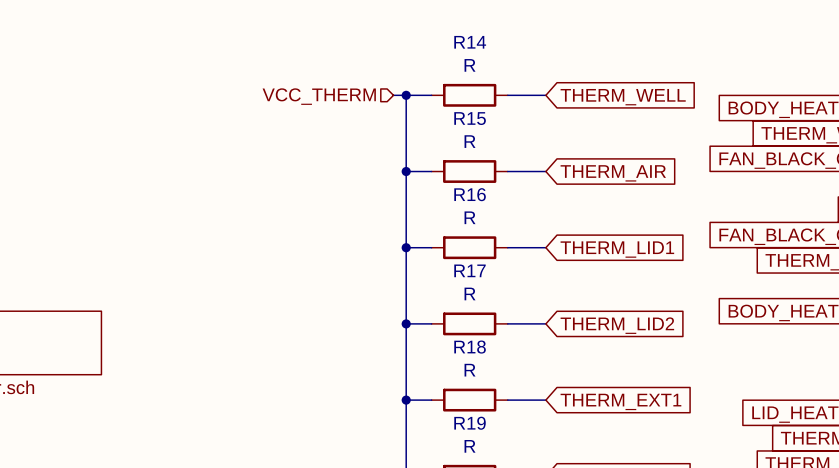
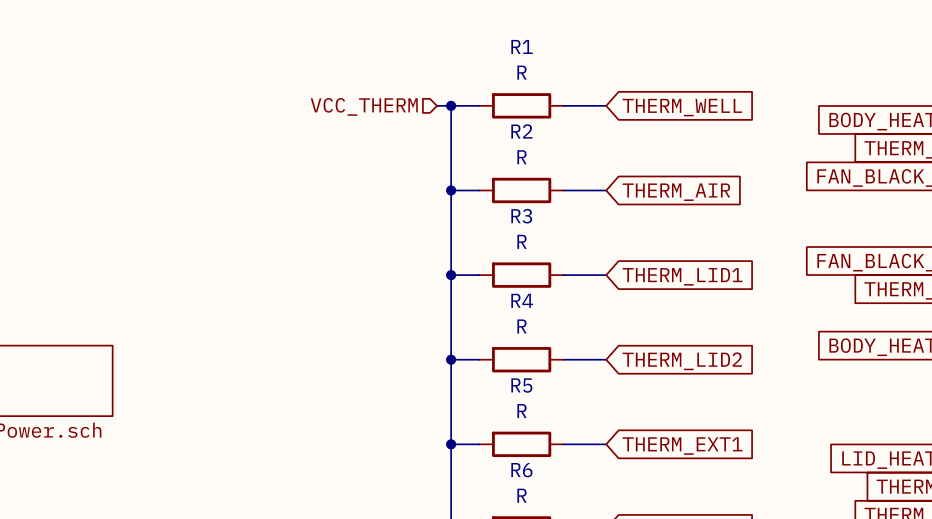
R14 name: R14 (470, 42) -> R1 (522, 46)
R15 name: R15 (470, 118) -> R2 (521, 131)
R16 name: R16 (470, 194) -> R3 (521, 216)
R17 name: R17 (469, 270) -> R4 (522, 300)
R18 name: R18 (470, 347) -> R5 (521, 385)
R19 name: R19 (470, 423) -> R6 (521, 470)

